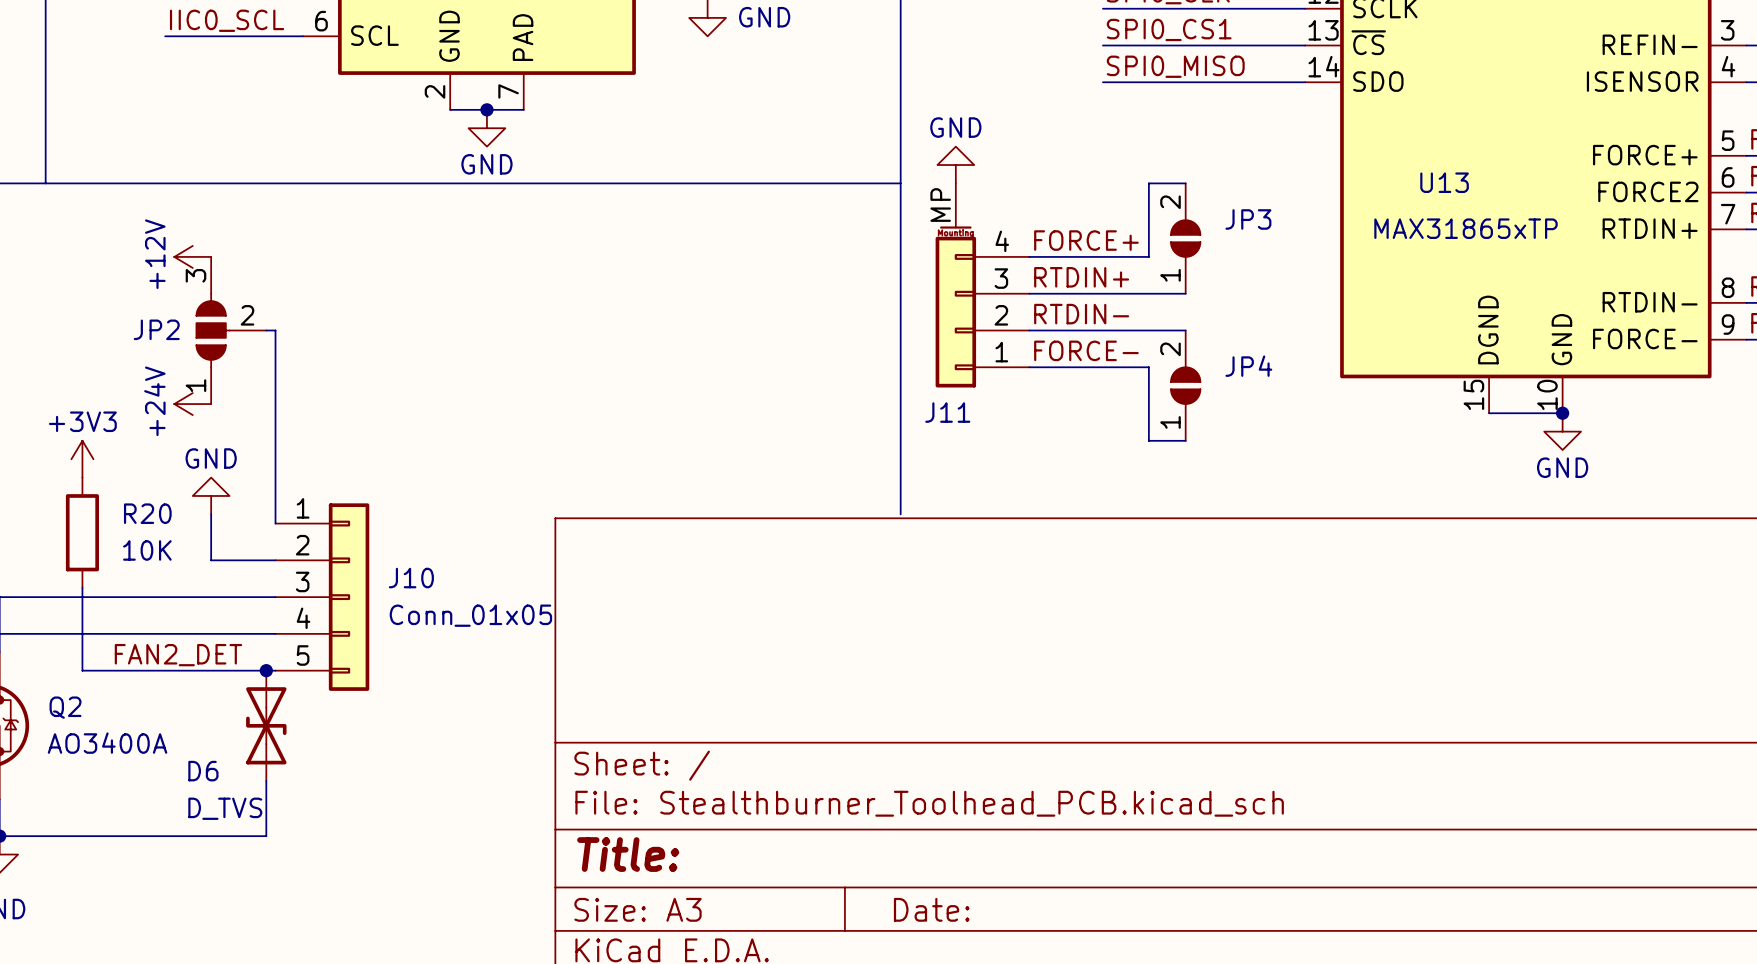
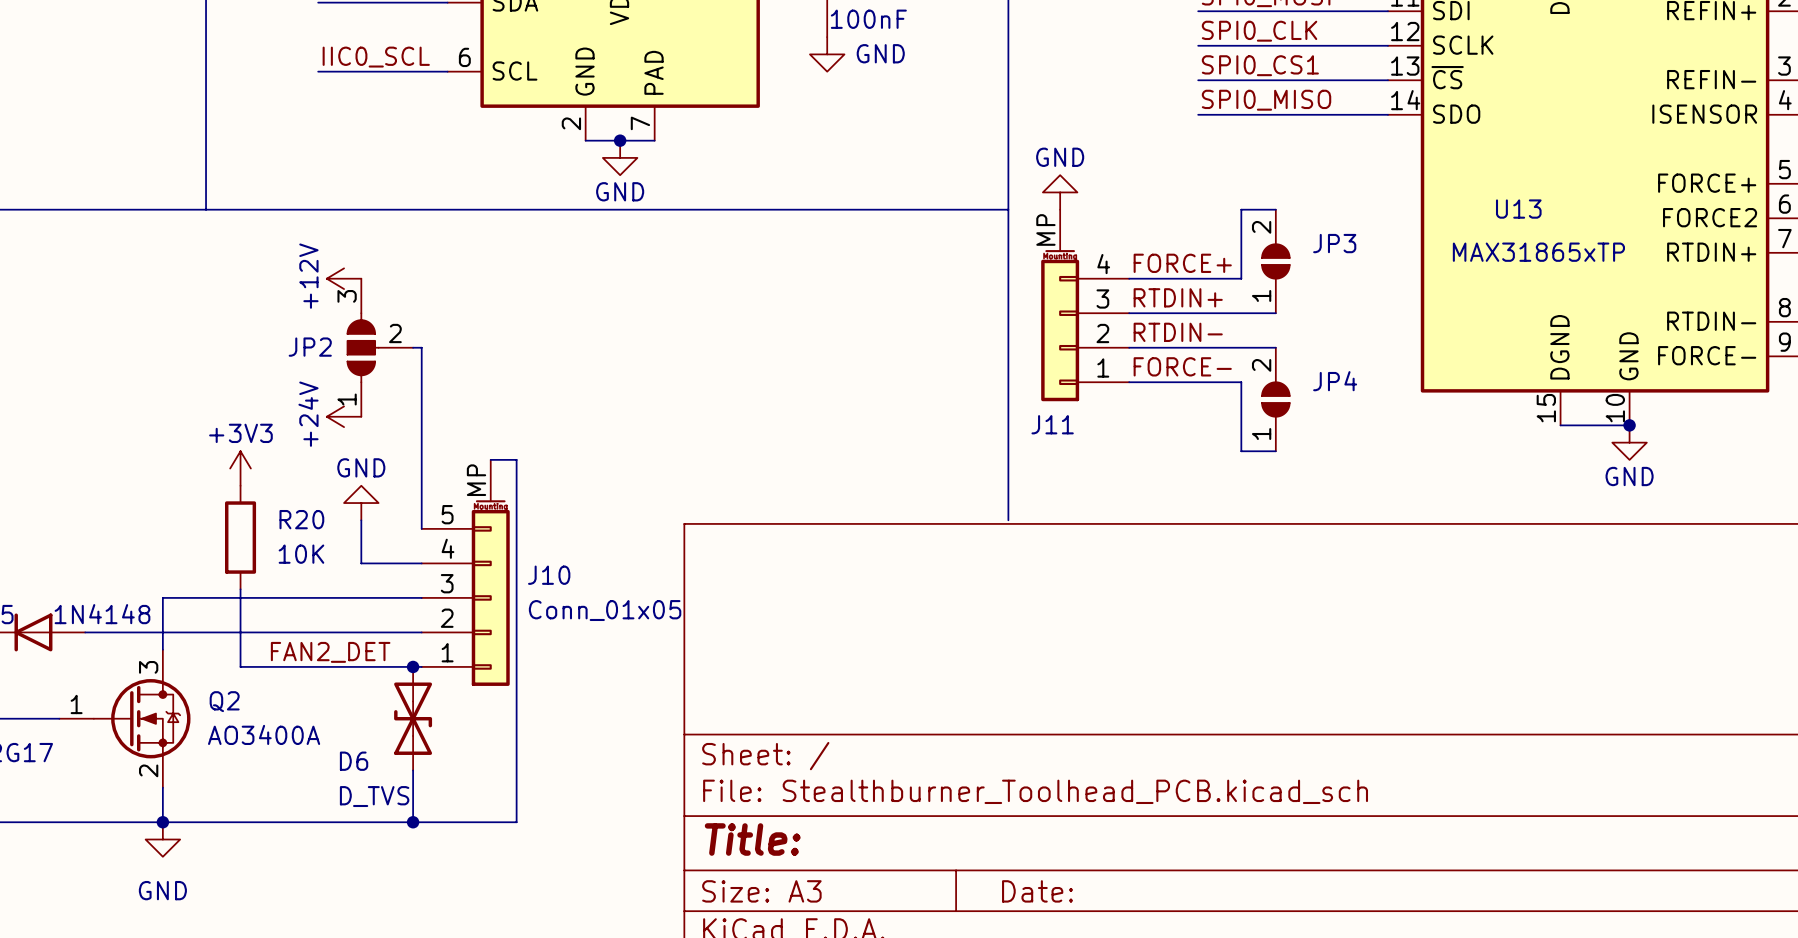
wire: none -> (490, 459) (516, 459) (516, 822) (413, 822)
J10 symbol: [275, 503, 370, 691] -> [421, 459, 510, 686]
junction: none -> (413, 822)

